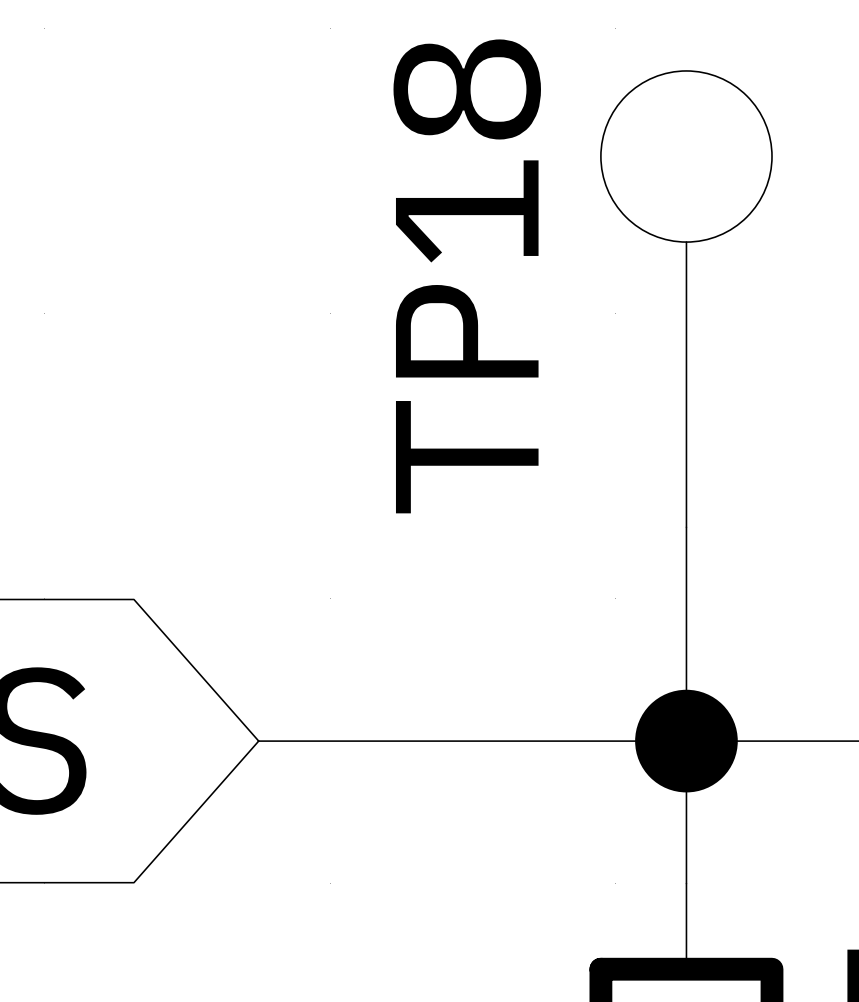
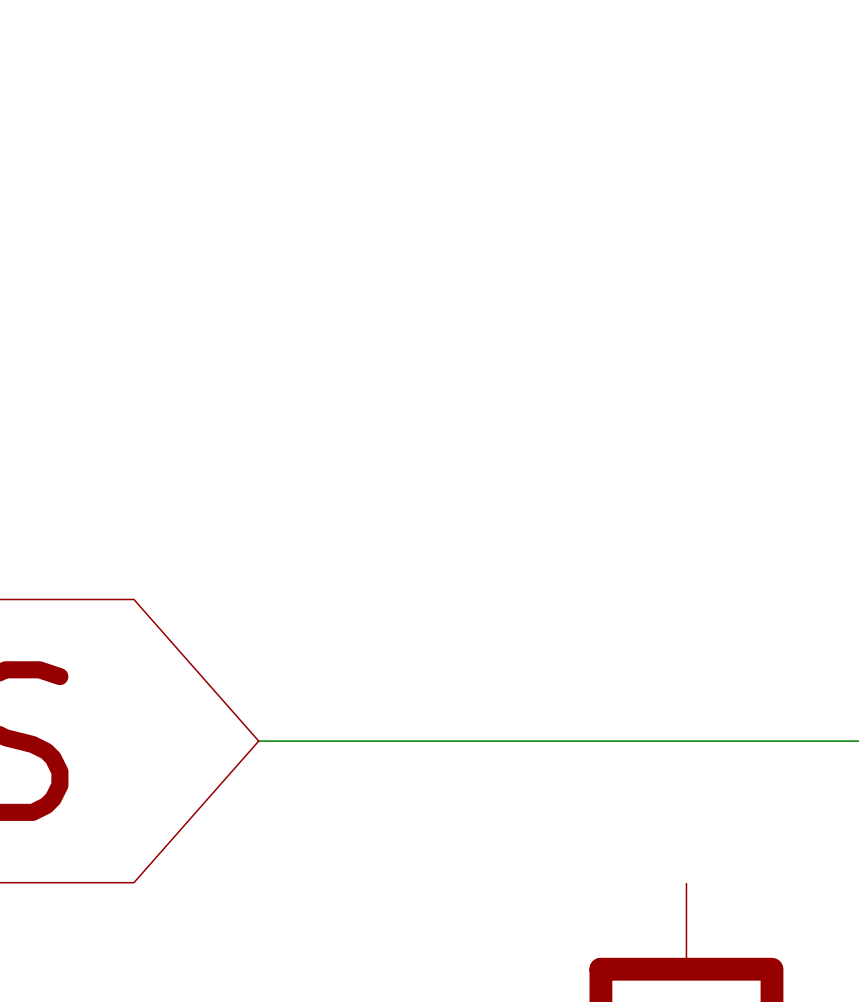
TP18: (686, 299) -> none
wire: (686, 527) (686, 883) -> none
junction: (686, 741) -> none

